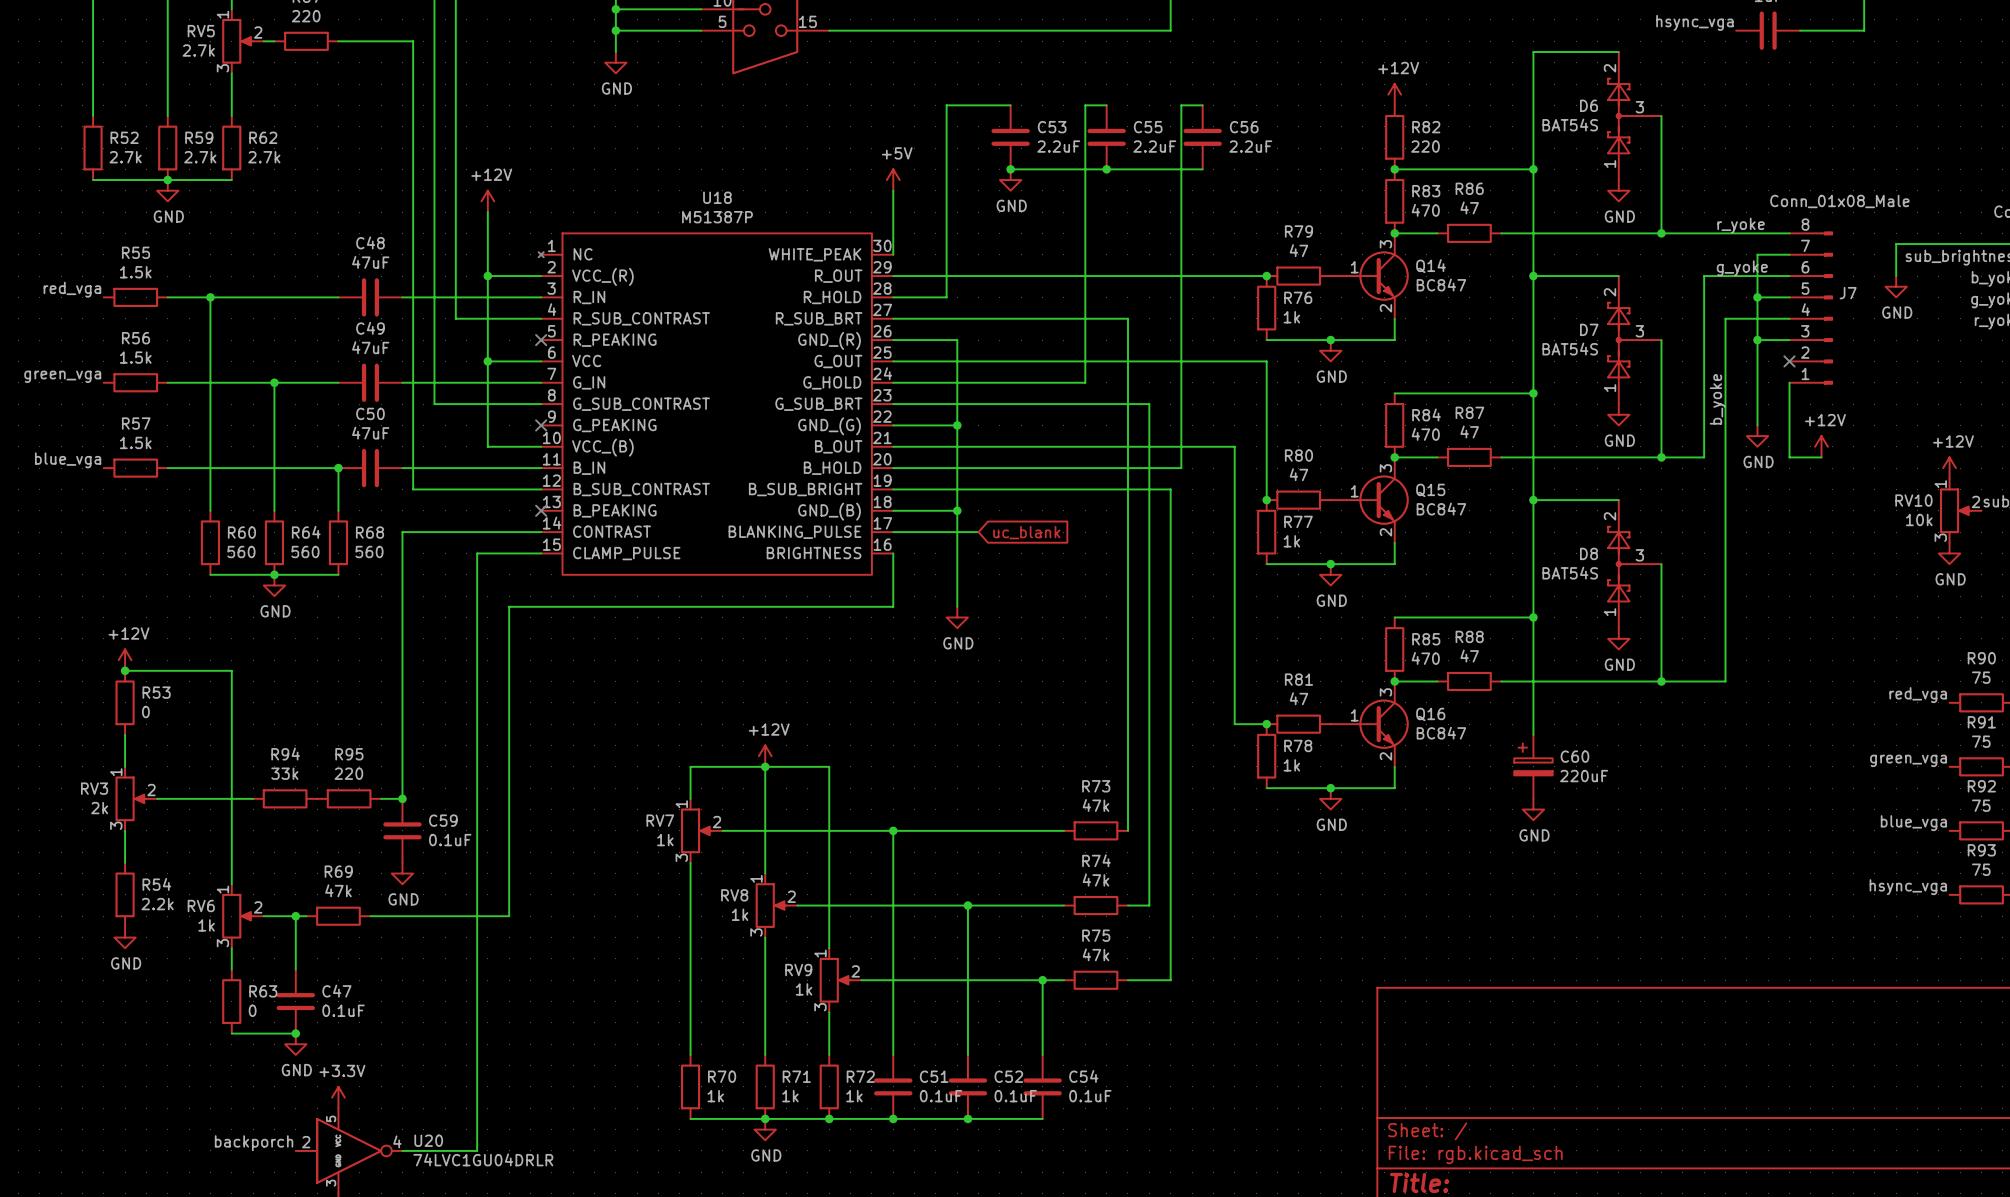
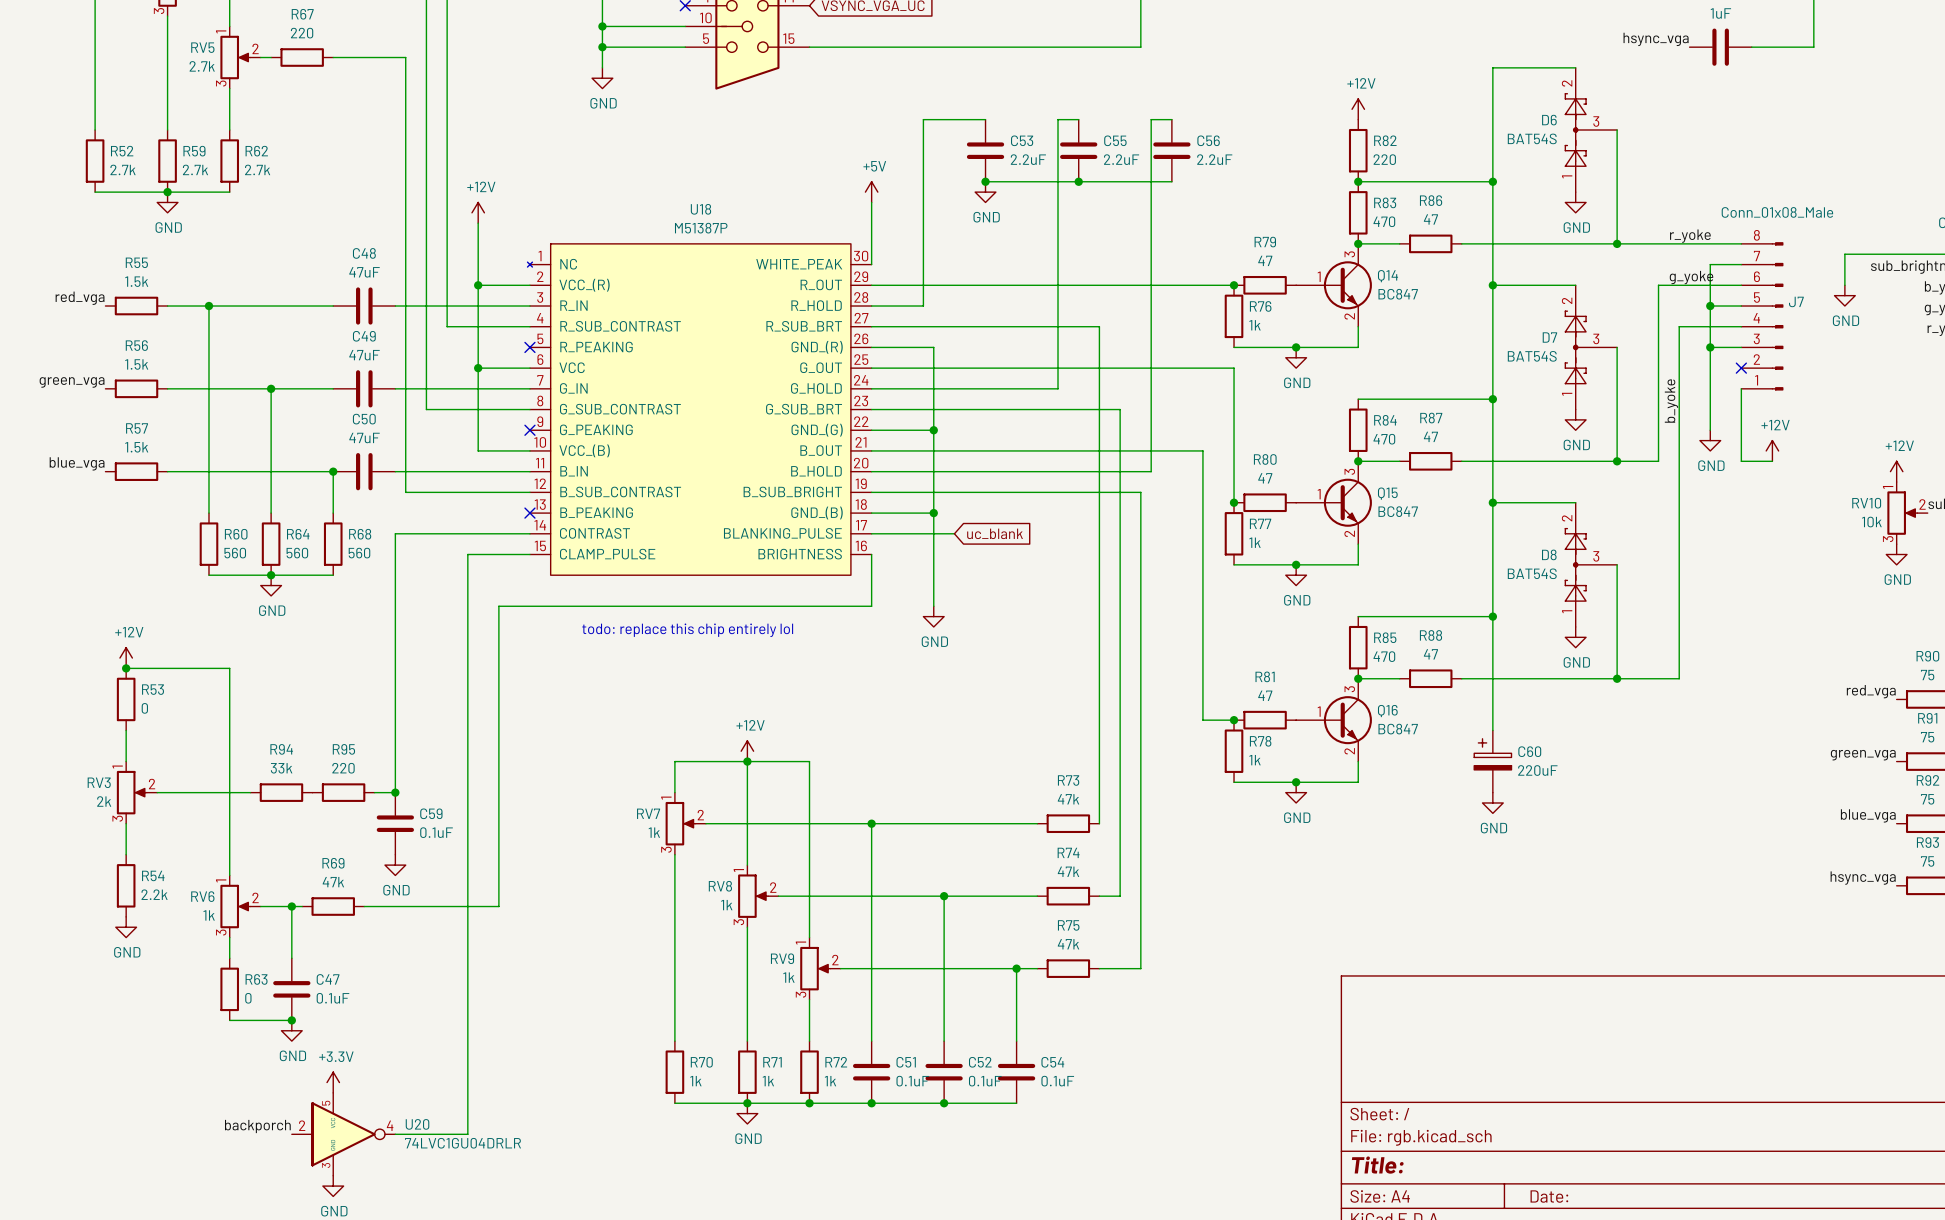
text: none -> todo: replace this chip entirely lol (687, 630)

